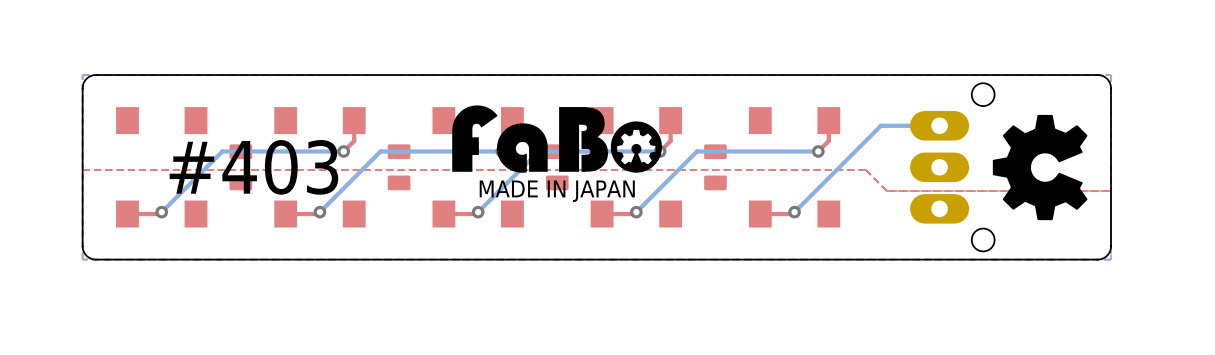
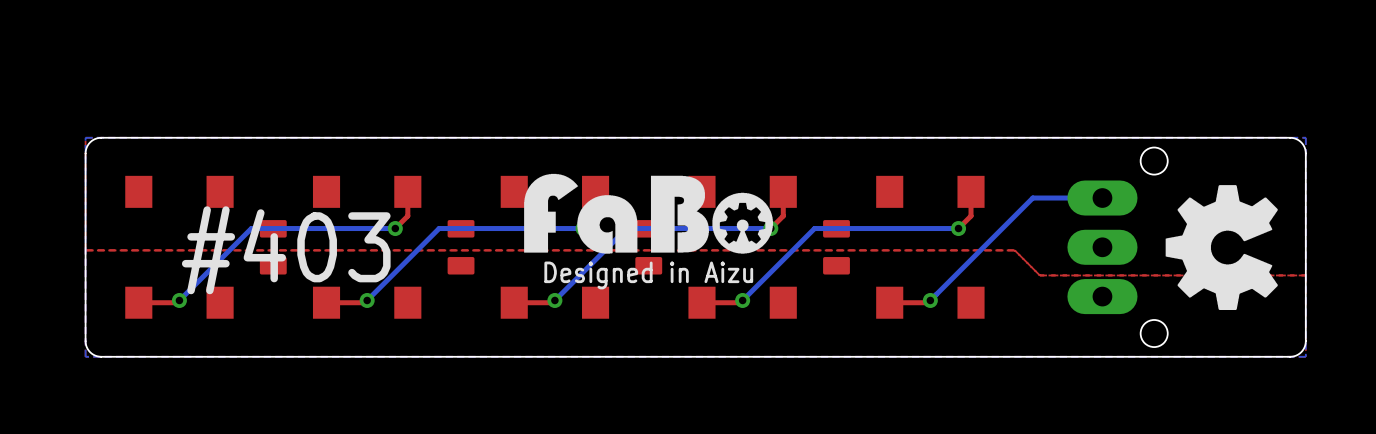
text: MADE IN JAPAN (557, 191) -> Designed in Aizu (648, 275)

